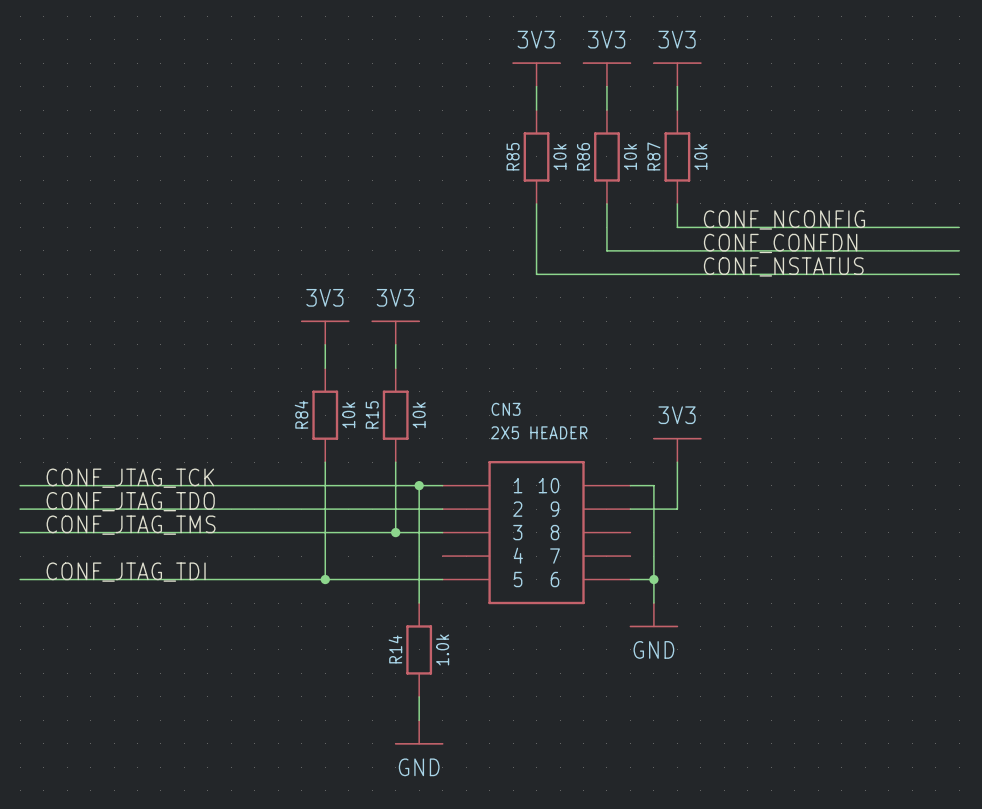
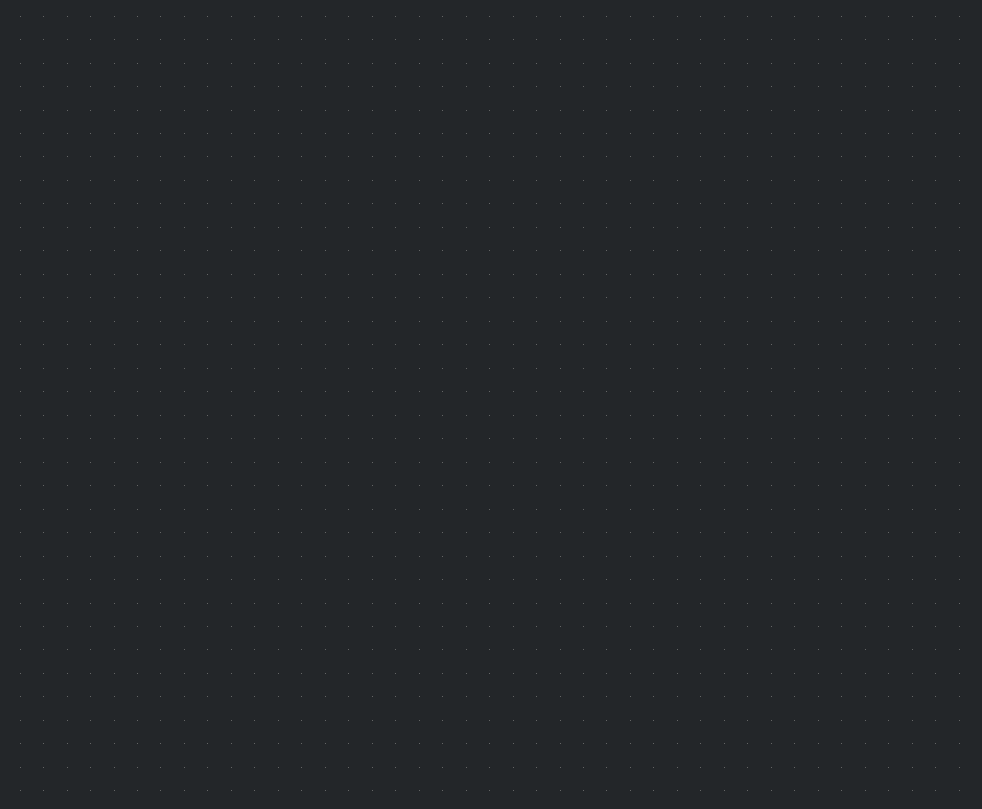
power symbol: 3V3 (536, 74) -> none
power symbol: 3V3 (606, 74) -> none
power symbol: 3V3 (677, 74) -> none
wire: (536, 86) (536, 110) -> none
wire: (606, 86) (606, 110) -> none
wire: (677, 86) (677, 110) -> none
R85: 10k (536, 156) -> none
R86: 10k (606, 156) -> none
R87: 10k (677, 156) -> none
wire: (536, 203) (536, 274) (959, 274) -> none
wire: (606, 203) (606, 250) (959, 250) -> none
wire: (677, 203) (677, 227) (959, 227) -> none
label: CONF_NCONFIG (784, 219) -> none
label: CONF_CONFDN (780, 243) -> none
label: CONF_NSTATUS (783, 266) -> none
power symbol: 3V3 (325, 332) -> none
power symbol: 3V3 (395, 332) -> none
wire: (325, 344) (325, 368) -> none
wire: (395, 344) (395, 368) -> none
R84: 10k (325, 415) -> none
R15: 10k (395, 415) -> none
power symbol: 3V3 (677, 450) -> none
wire: (325, 462) (325, 579) -> none
wire: (395, 462) (395, 532) -> none
wire: (677, 462) (677, 509) (630, 509) -> none
label: CONF_JTAG_TCK (130, 478) -> none
wire: (20, 485) (442, 485) -> none
wire: (419, 485) (419, 603) -> none
junction: (419, 485) -> none
wire: (630, 485) (653, 485) (653, 603) -> none
label: CONF_JTAG_TDO (130, 501) -> none
wire: (20, 509) (442, 509) -> none
label: CONF_JTAG_TMS (131, 525) -> none
wire: (20, 532) (442, 532) -> none
junction: (395, 532) -> none
CN3: 2X5 HEADER (536, 532) -> none
label: CONF_JTAG_TDI (126, 572) -> none
wire: (20, 579) (442, 579) -> none
junction: (325, 579) -> none
wire: (630, 579) (653, 579) -> none
junction: (653, 579) -> none
power symbol: GND (653, 615) -> none
R14: 1.0k (419, 649) -> none
wire: (419, 696) (419, 720) -> none
power symbol: GND (419, 732) -> none

